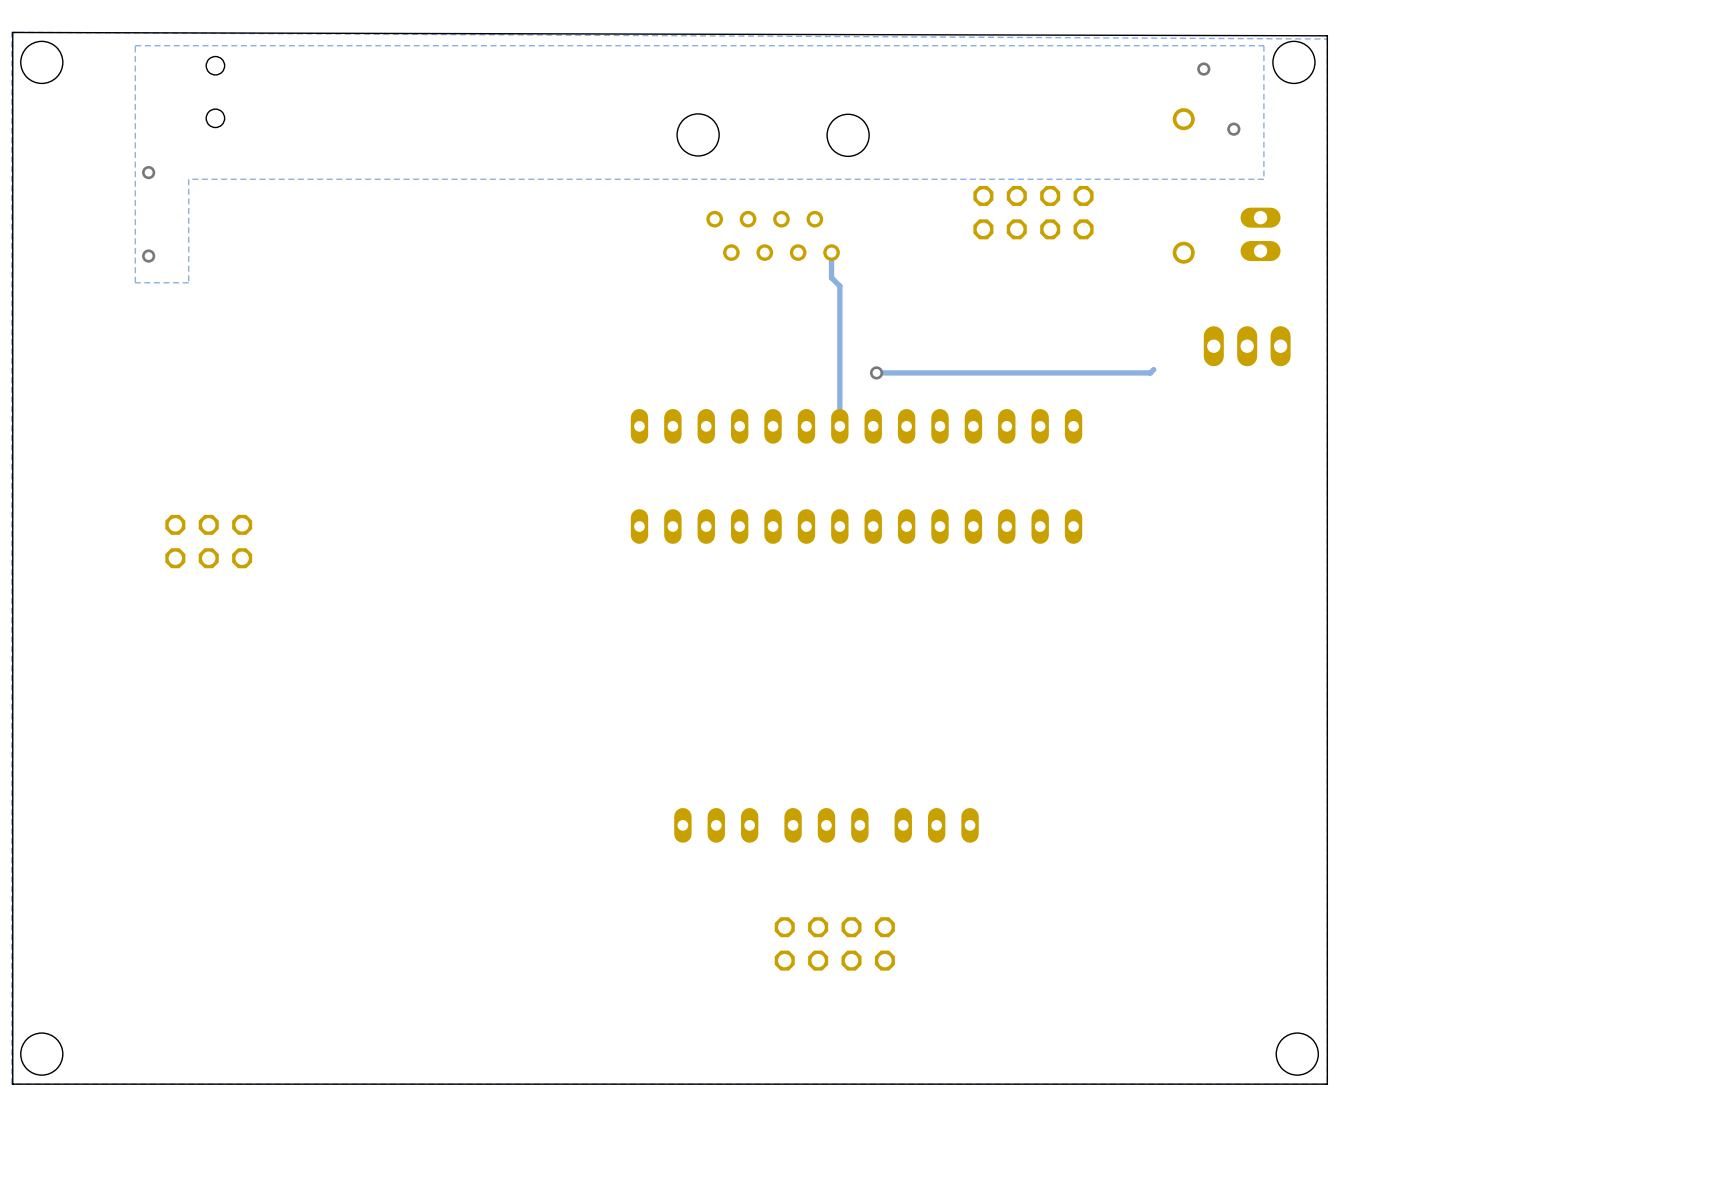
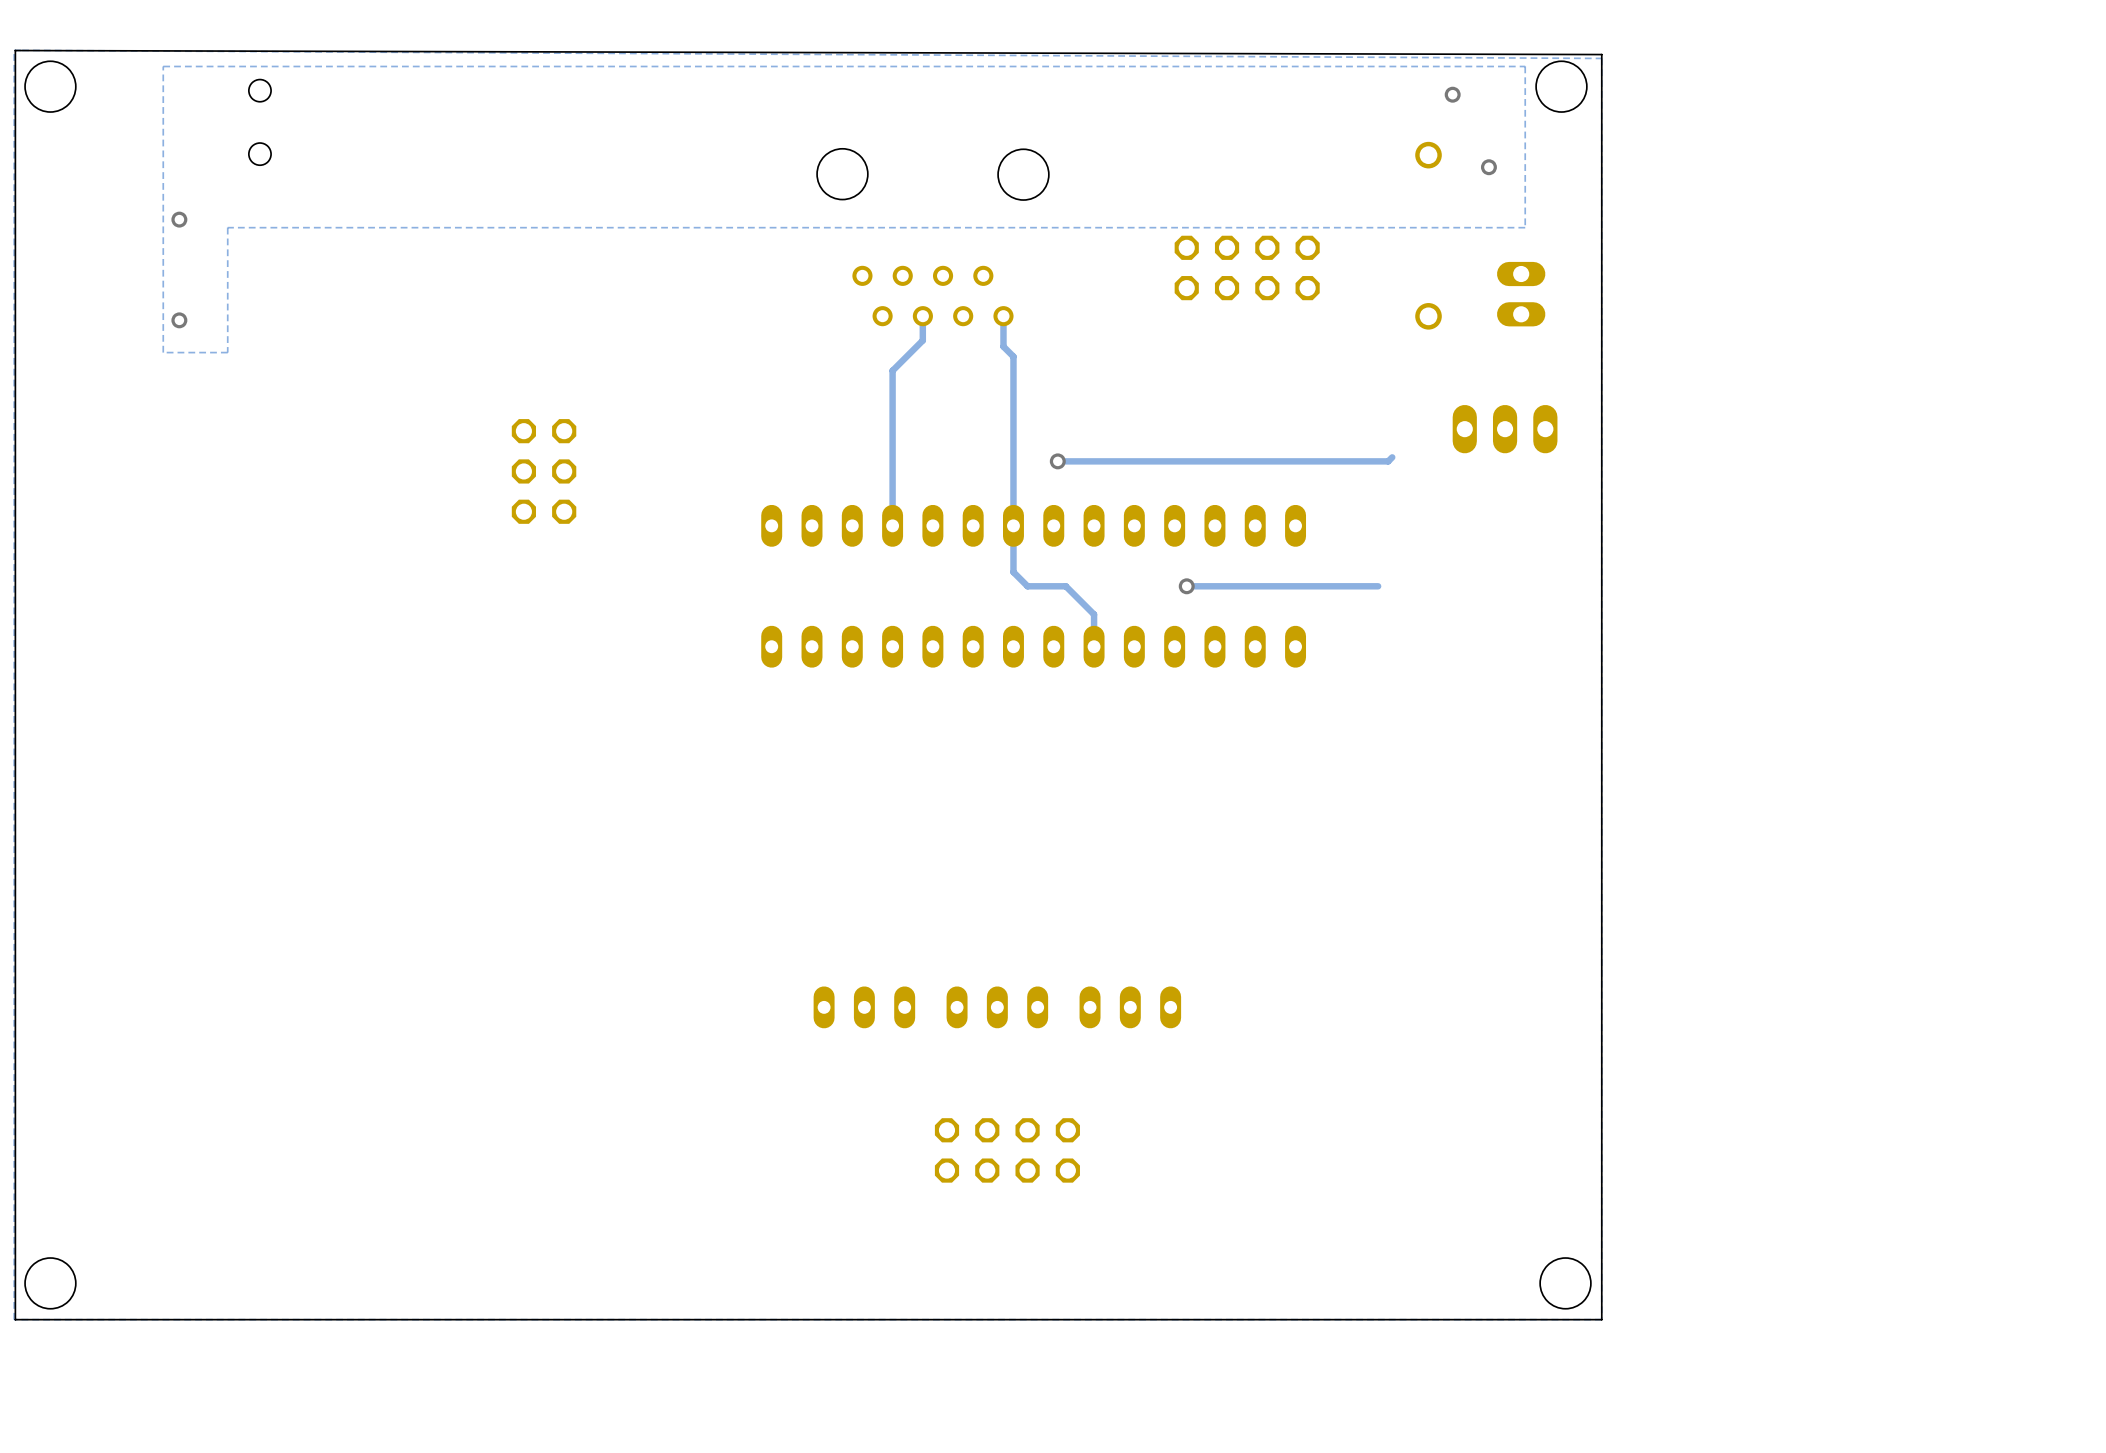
track: none -> (922, 316) (922, 340) (892, 370) (892, 525)
track: none -> (1013, 525) (1013, 572) (1027, 586) (1065, 586) (1094, 614) (1094, 646)
via: none -> (1186, 586)
track: none -> (1378, 586) (1186, 586)
part rotation: 0° (208, 541) -> 90° clockwise (544, 471)
part position: (208, 541) -> (544, 471)

